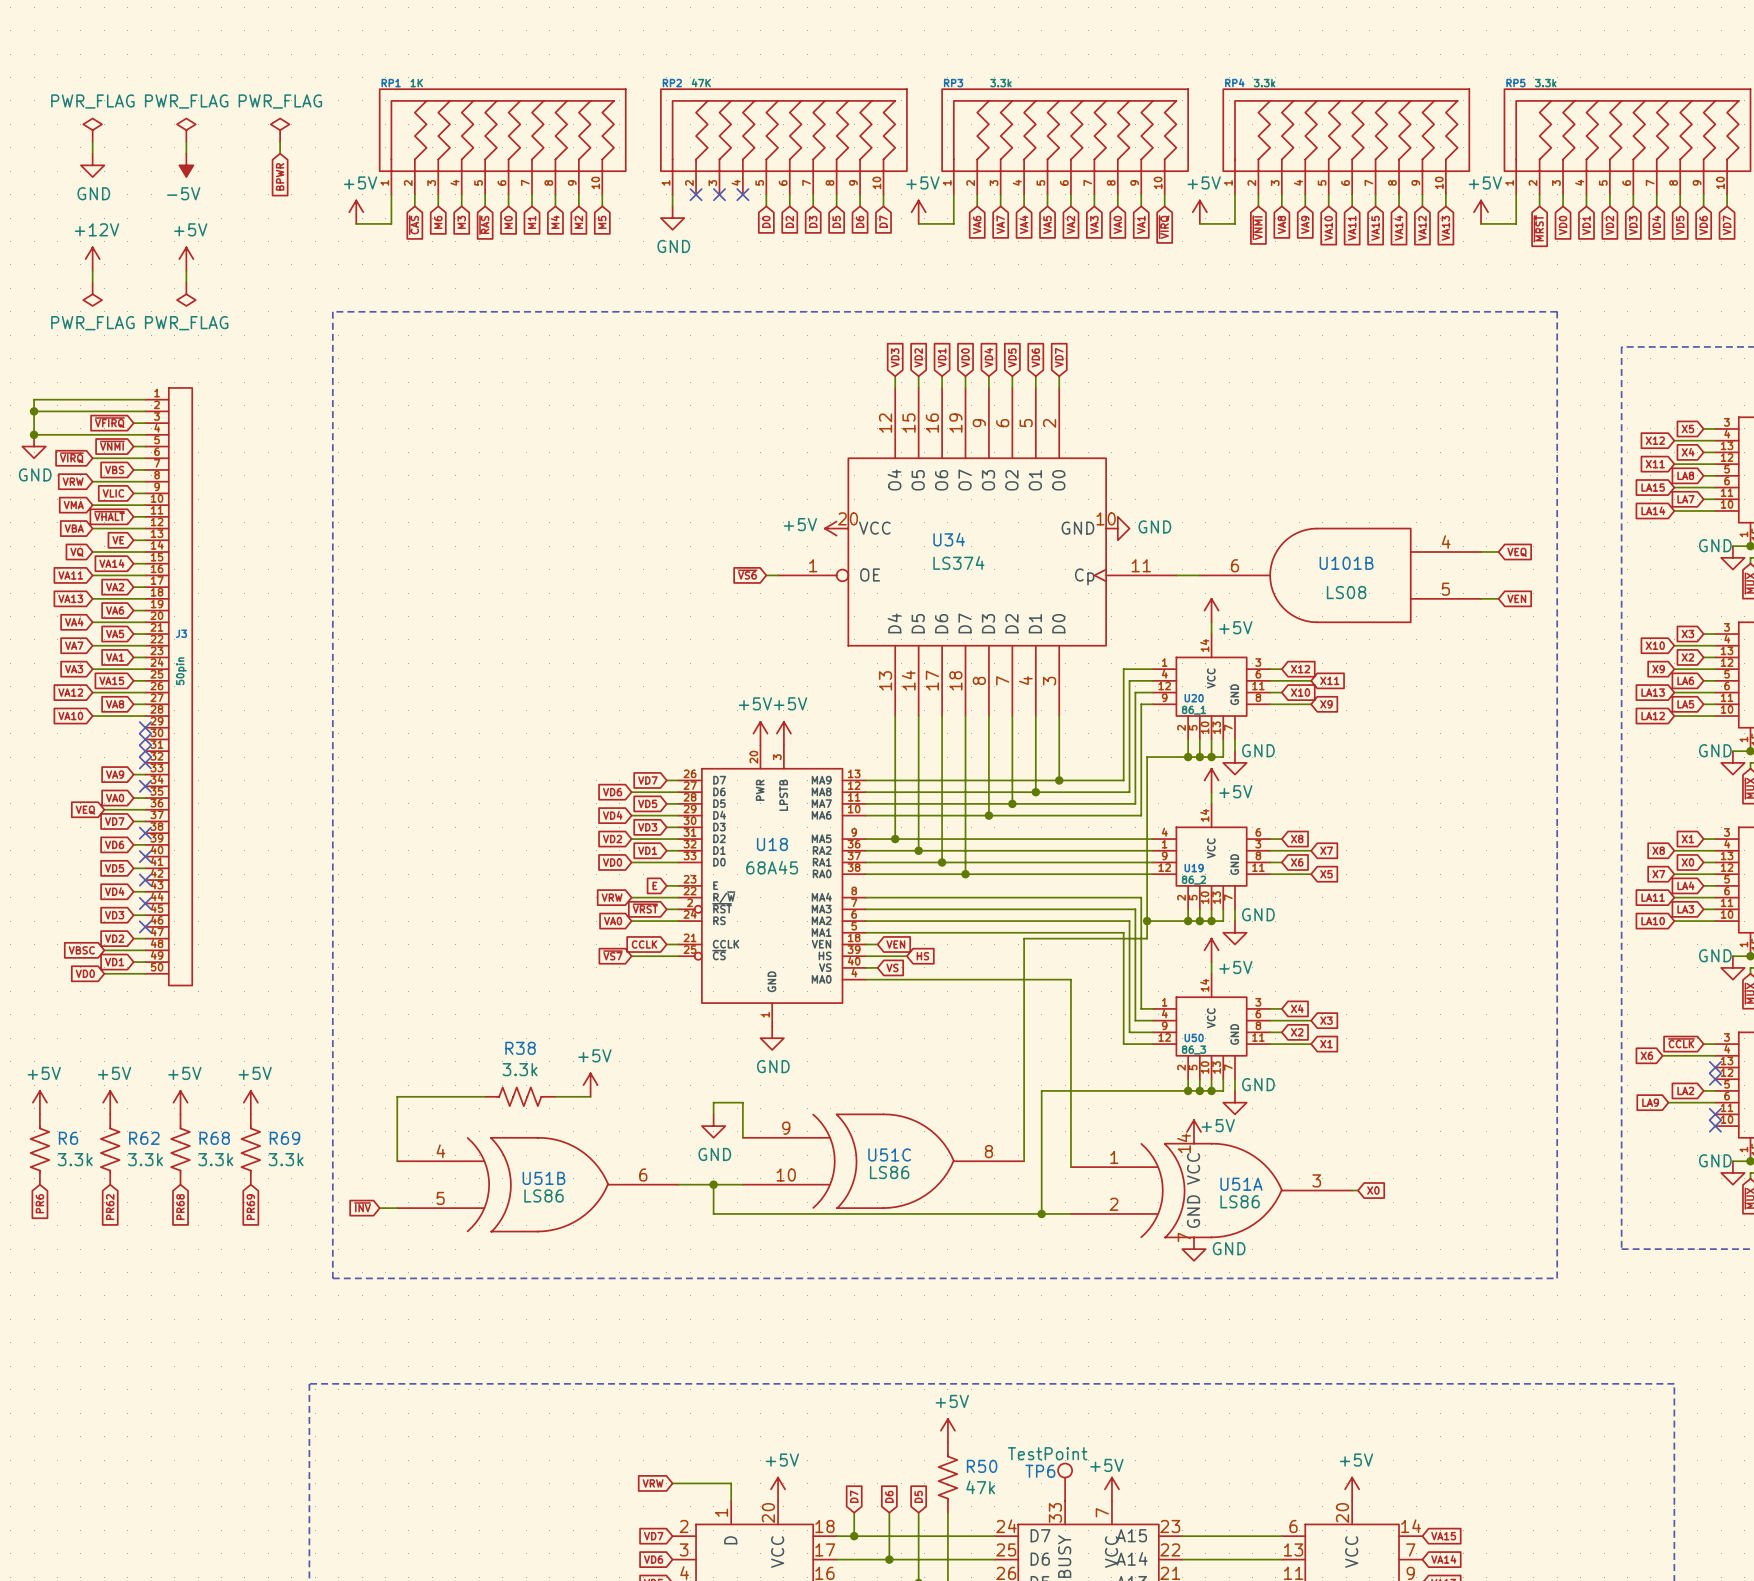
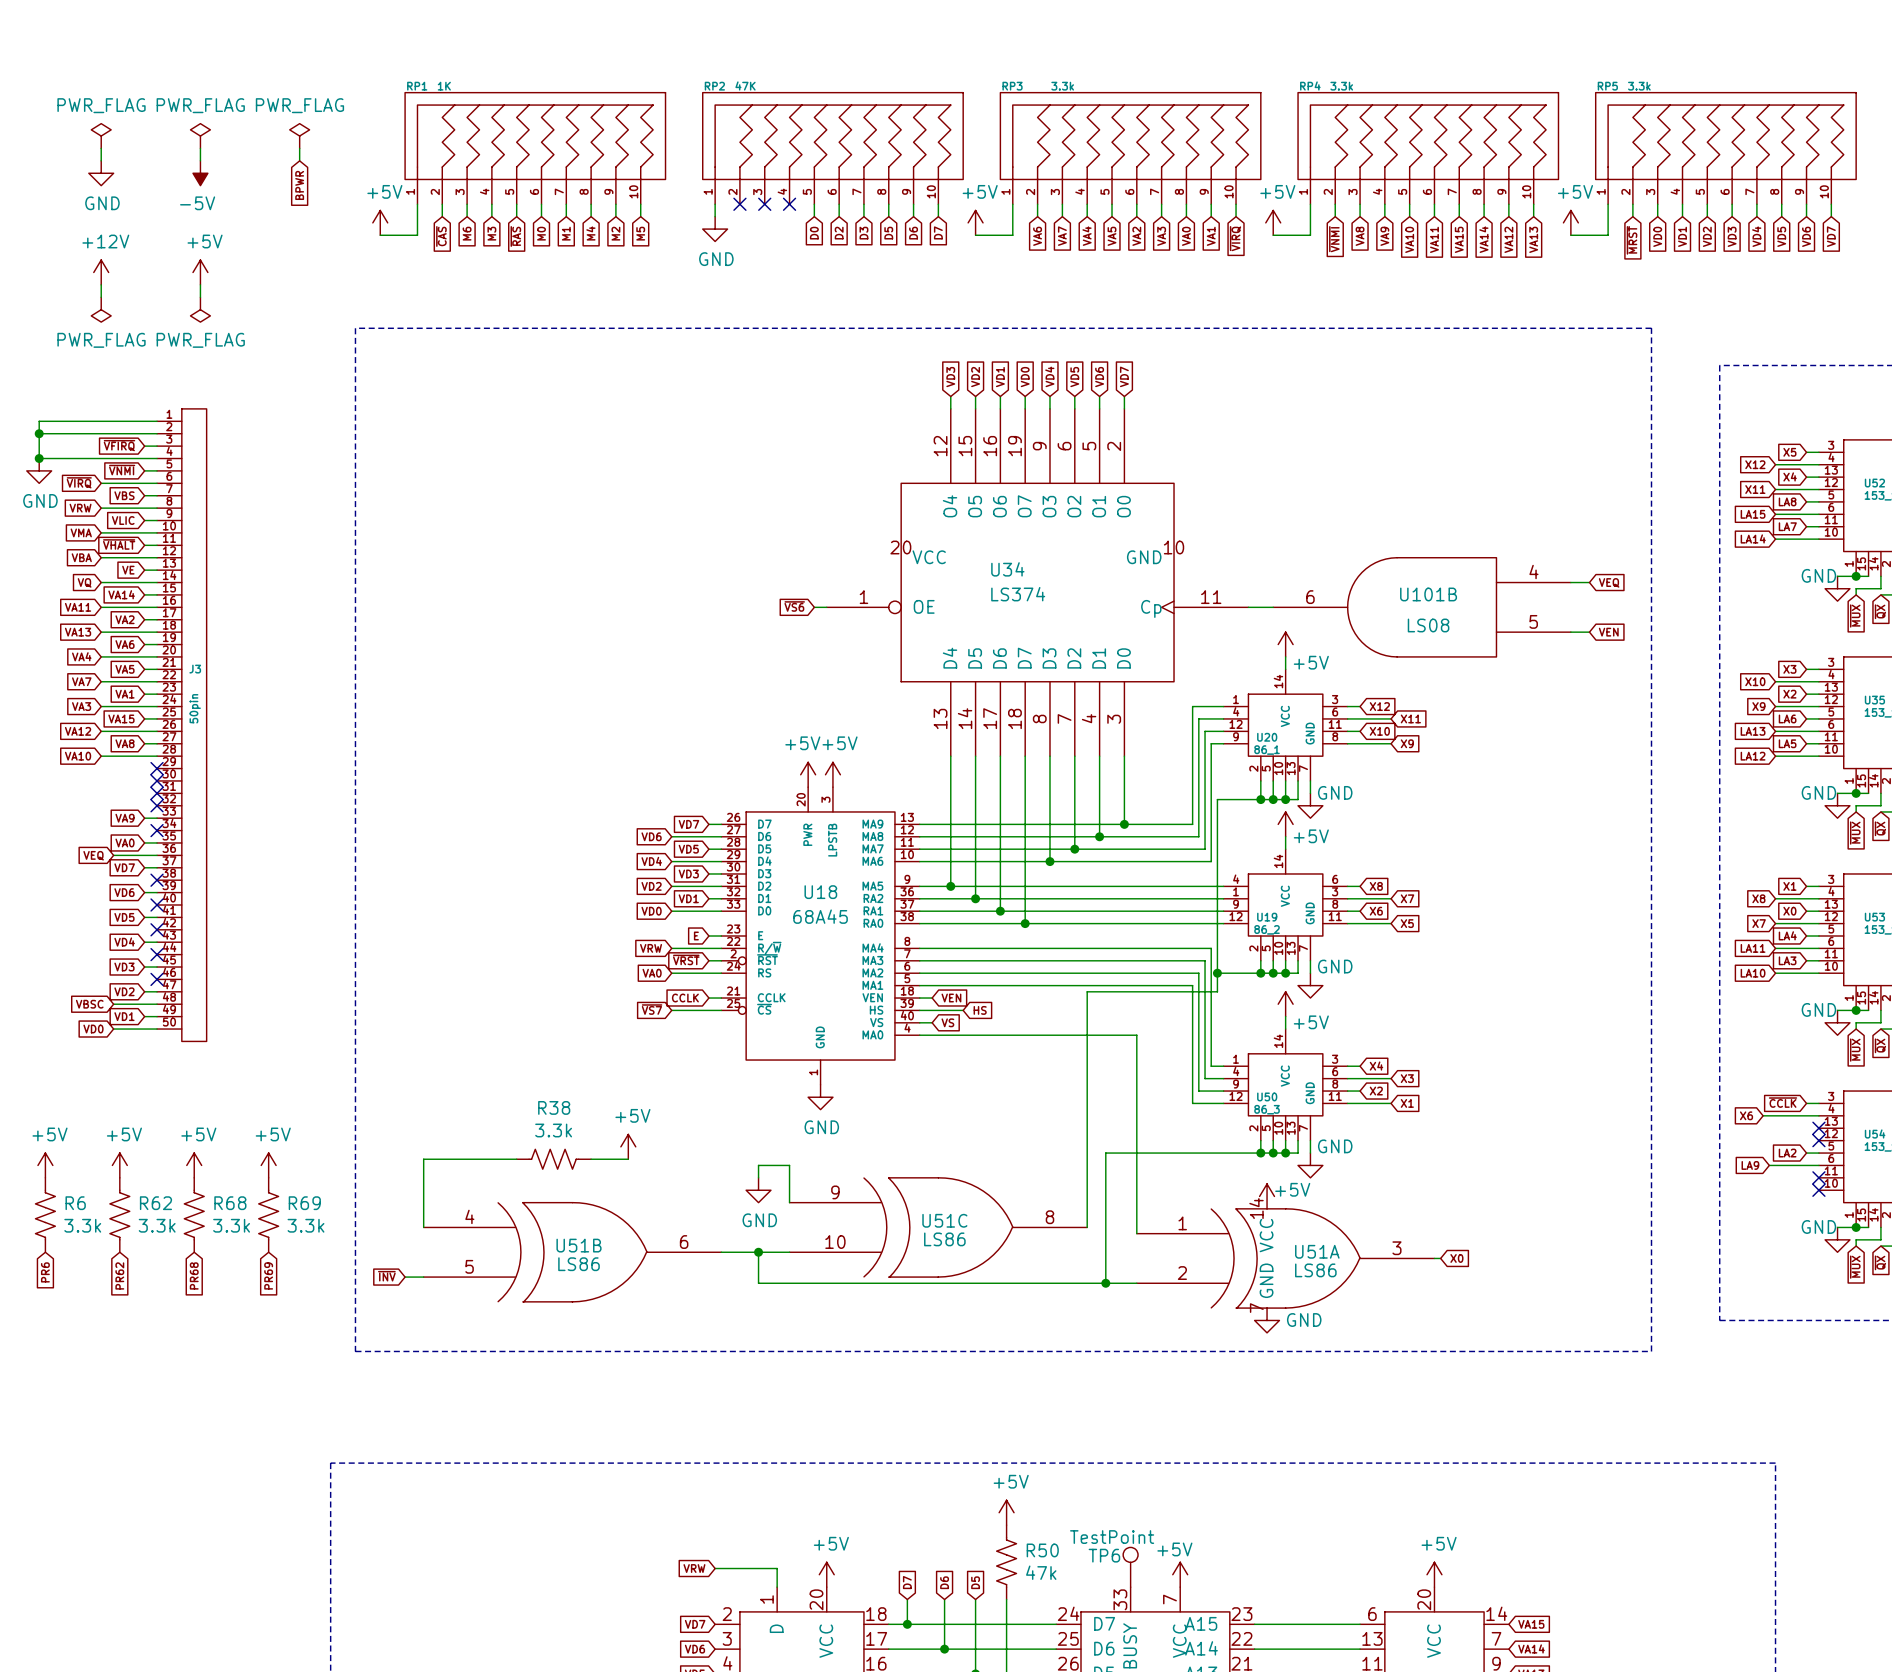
power symbol: +5V (836, 528) -> none
power symbol: GND (1117, 528) -> none

